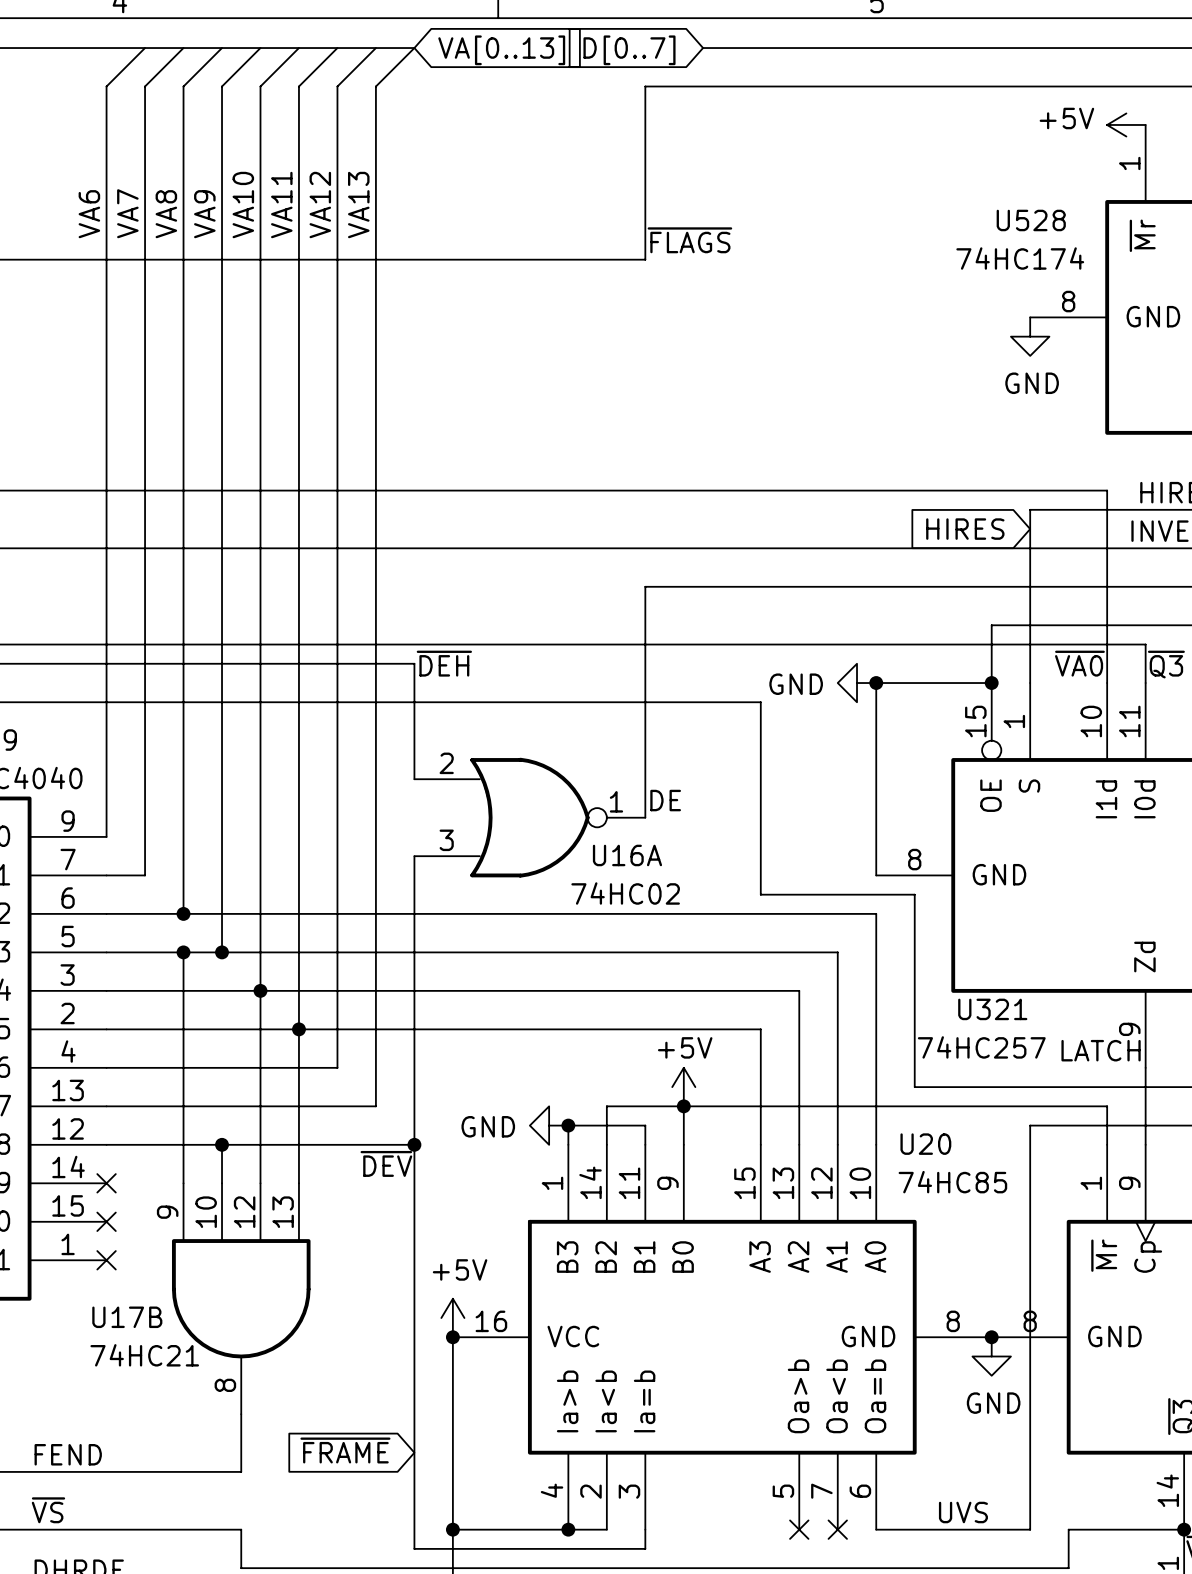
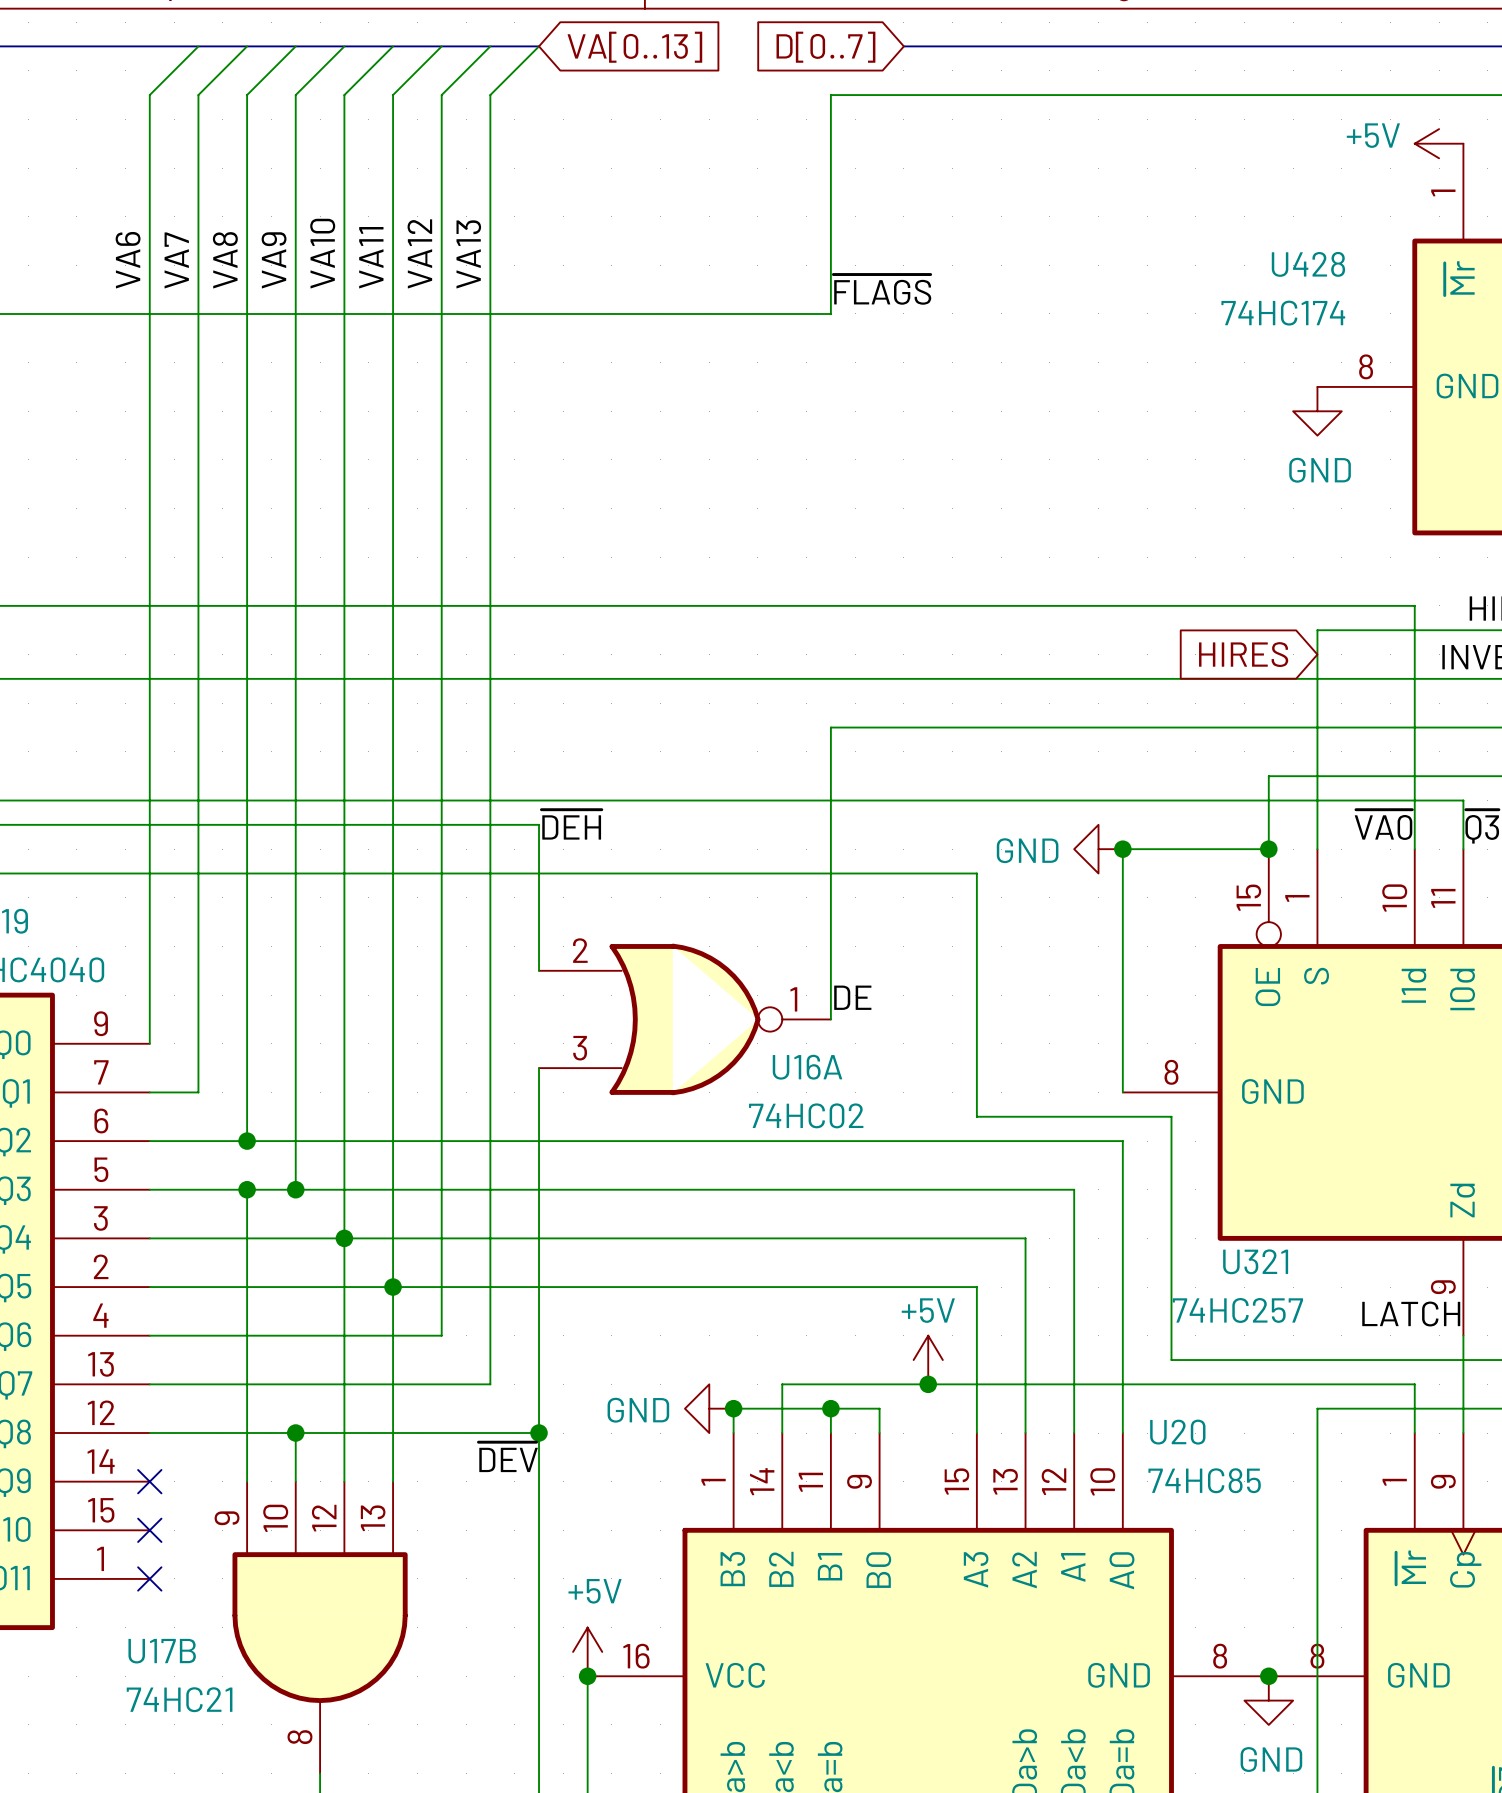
U528 name: U528 (1031, 220) -> U428 (1308, 264)
power symbol position: +5V (683, 1087) -> +5V (928, 1360)
wire: (683, 1106) (683, 1125) -> (830, 1408) (879, 1408)
junction: (683, 1106) -> none
junction: none -> (928, 1384)
junction: none -> (830, 1408)

